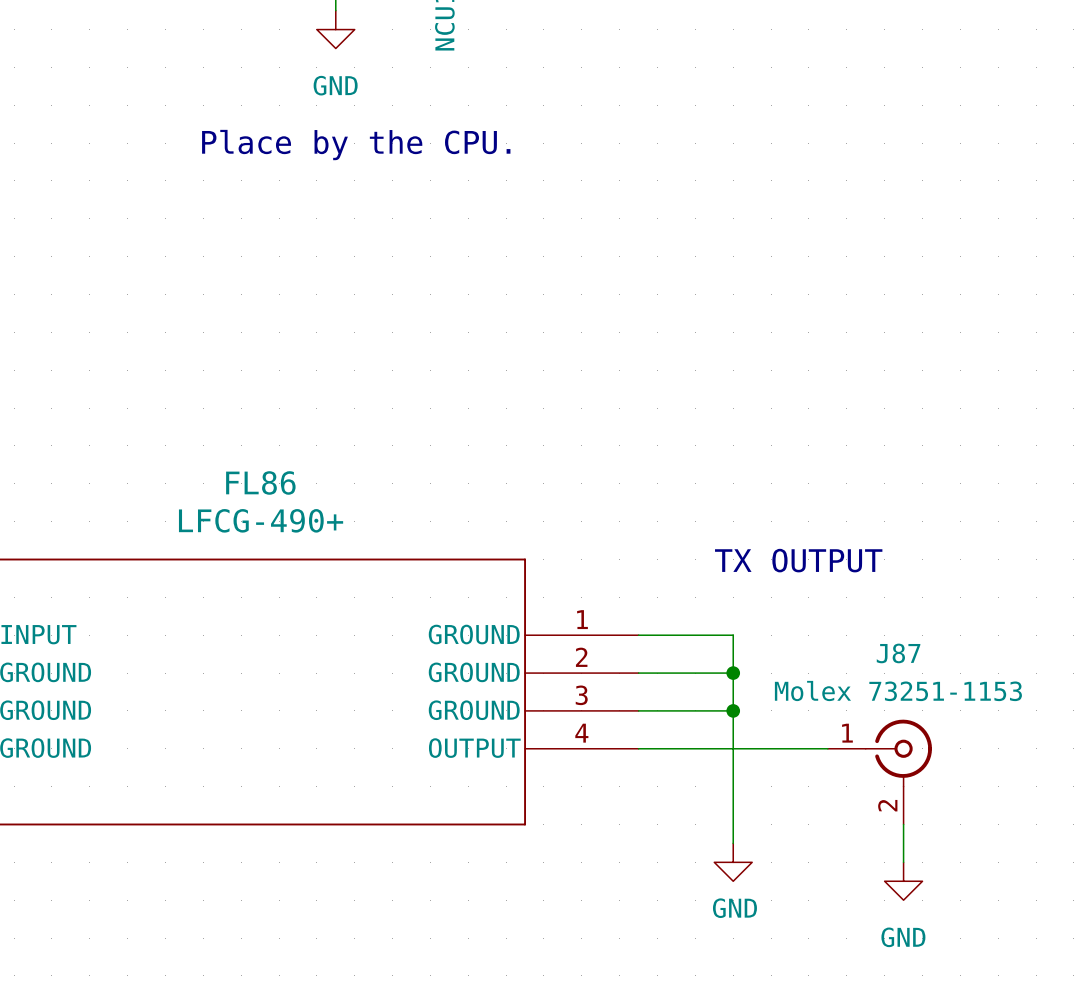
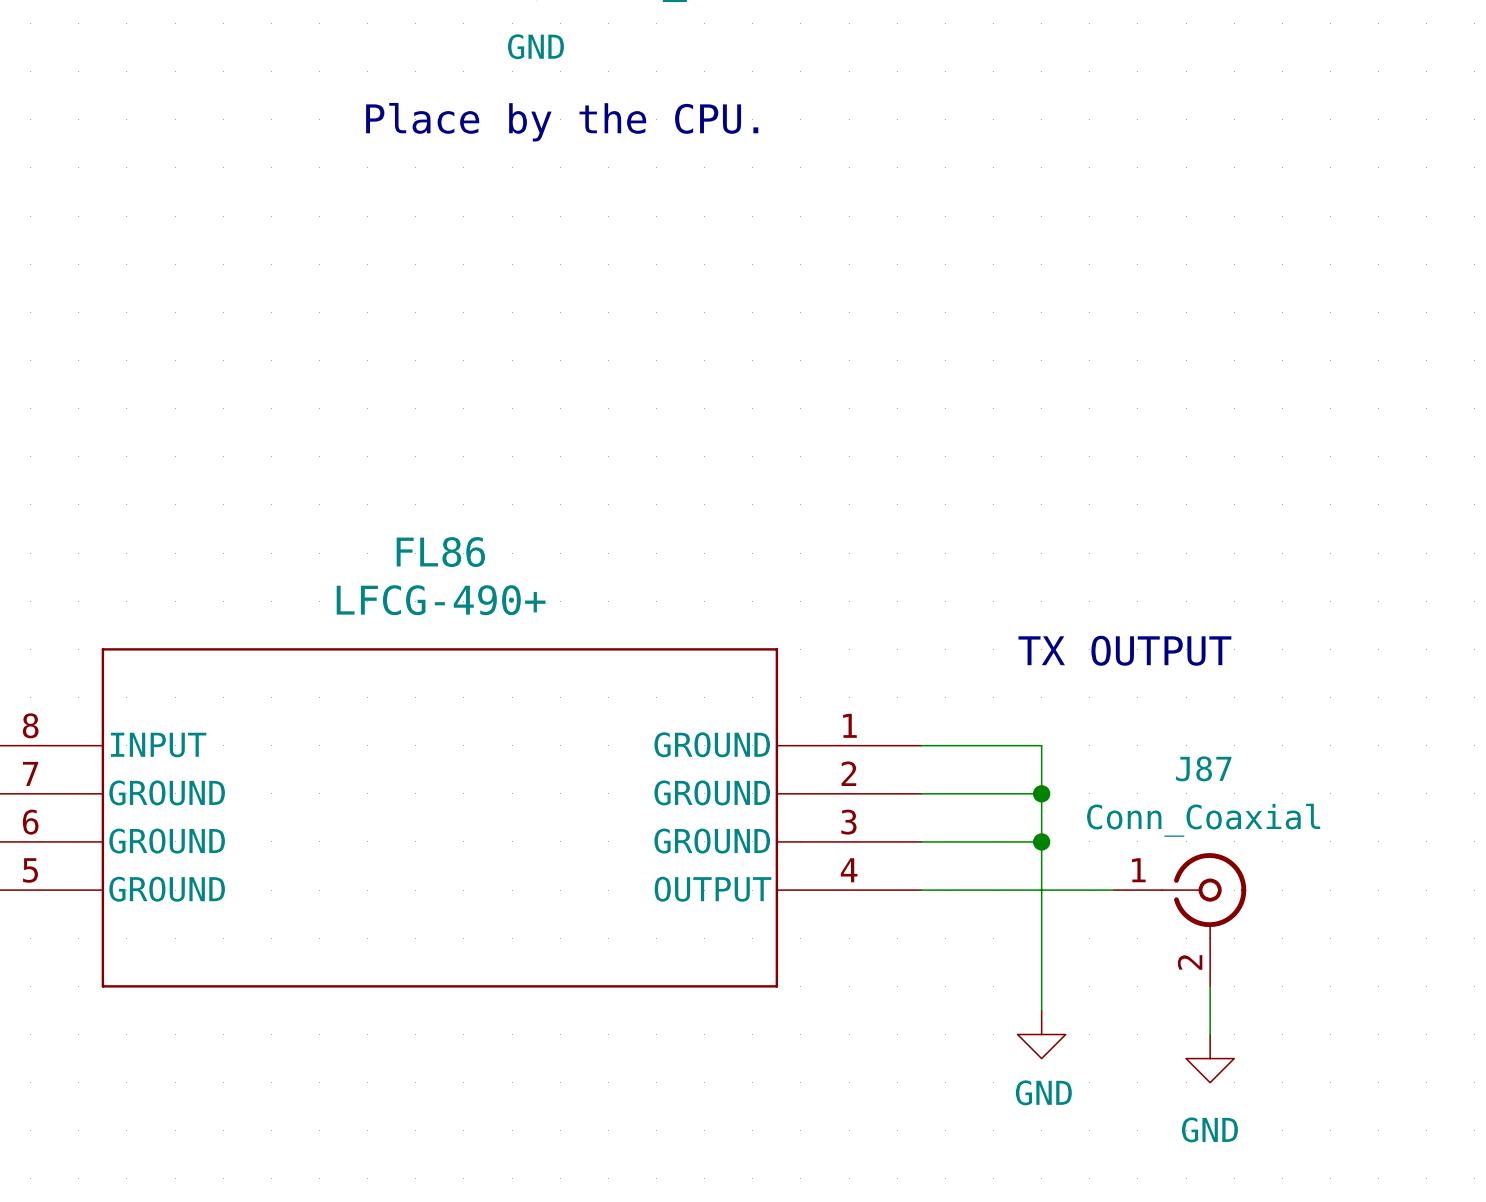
J87 value: Molex 73251-1153 (898, 691) -> Conn_Coaxial (1203, 820)
J87 position: (879, 772) -> (1180, 919)
wire: (903, 824) (903, 862) -> (1210, 986) (1210, 1034)
power symbol position: GND (903, 881) -> GND (1210, 1058)

